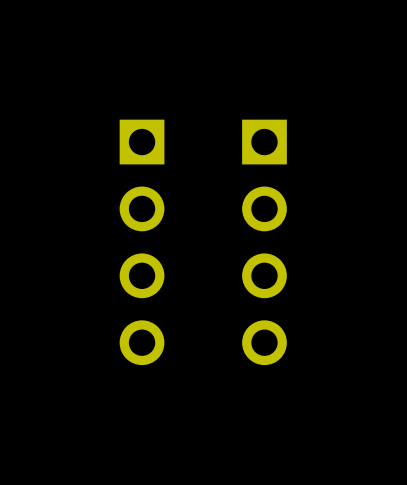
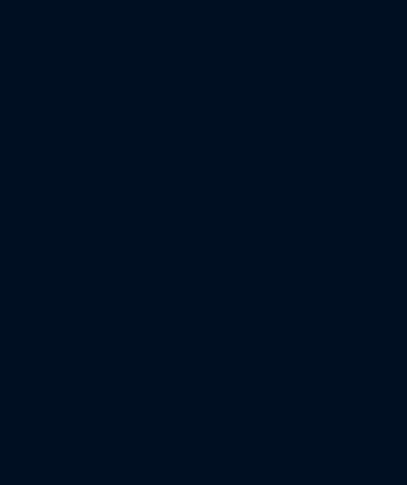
part: (142, 242) -> none
part: (264, 242) -> none

